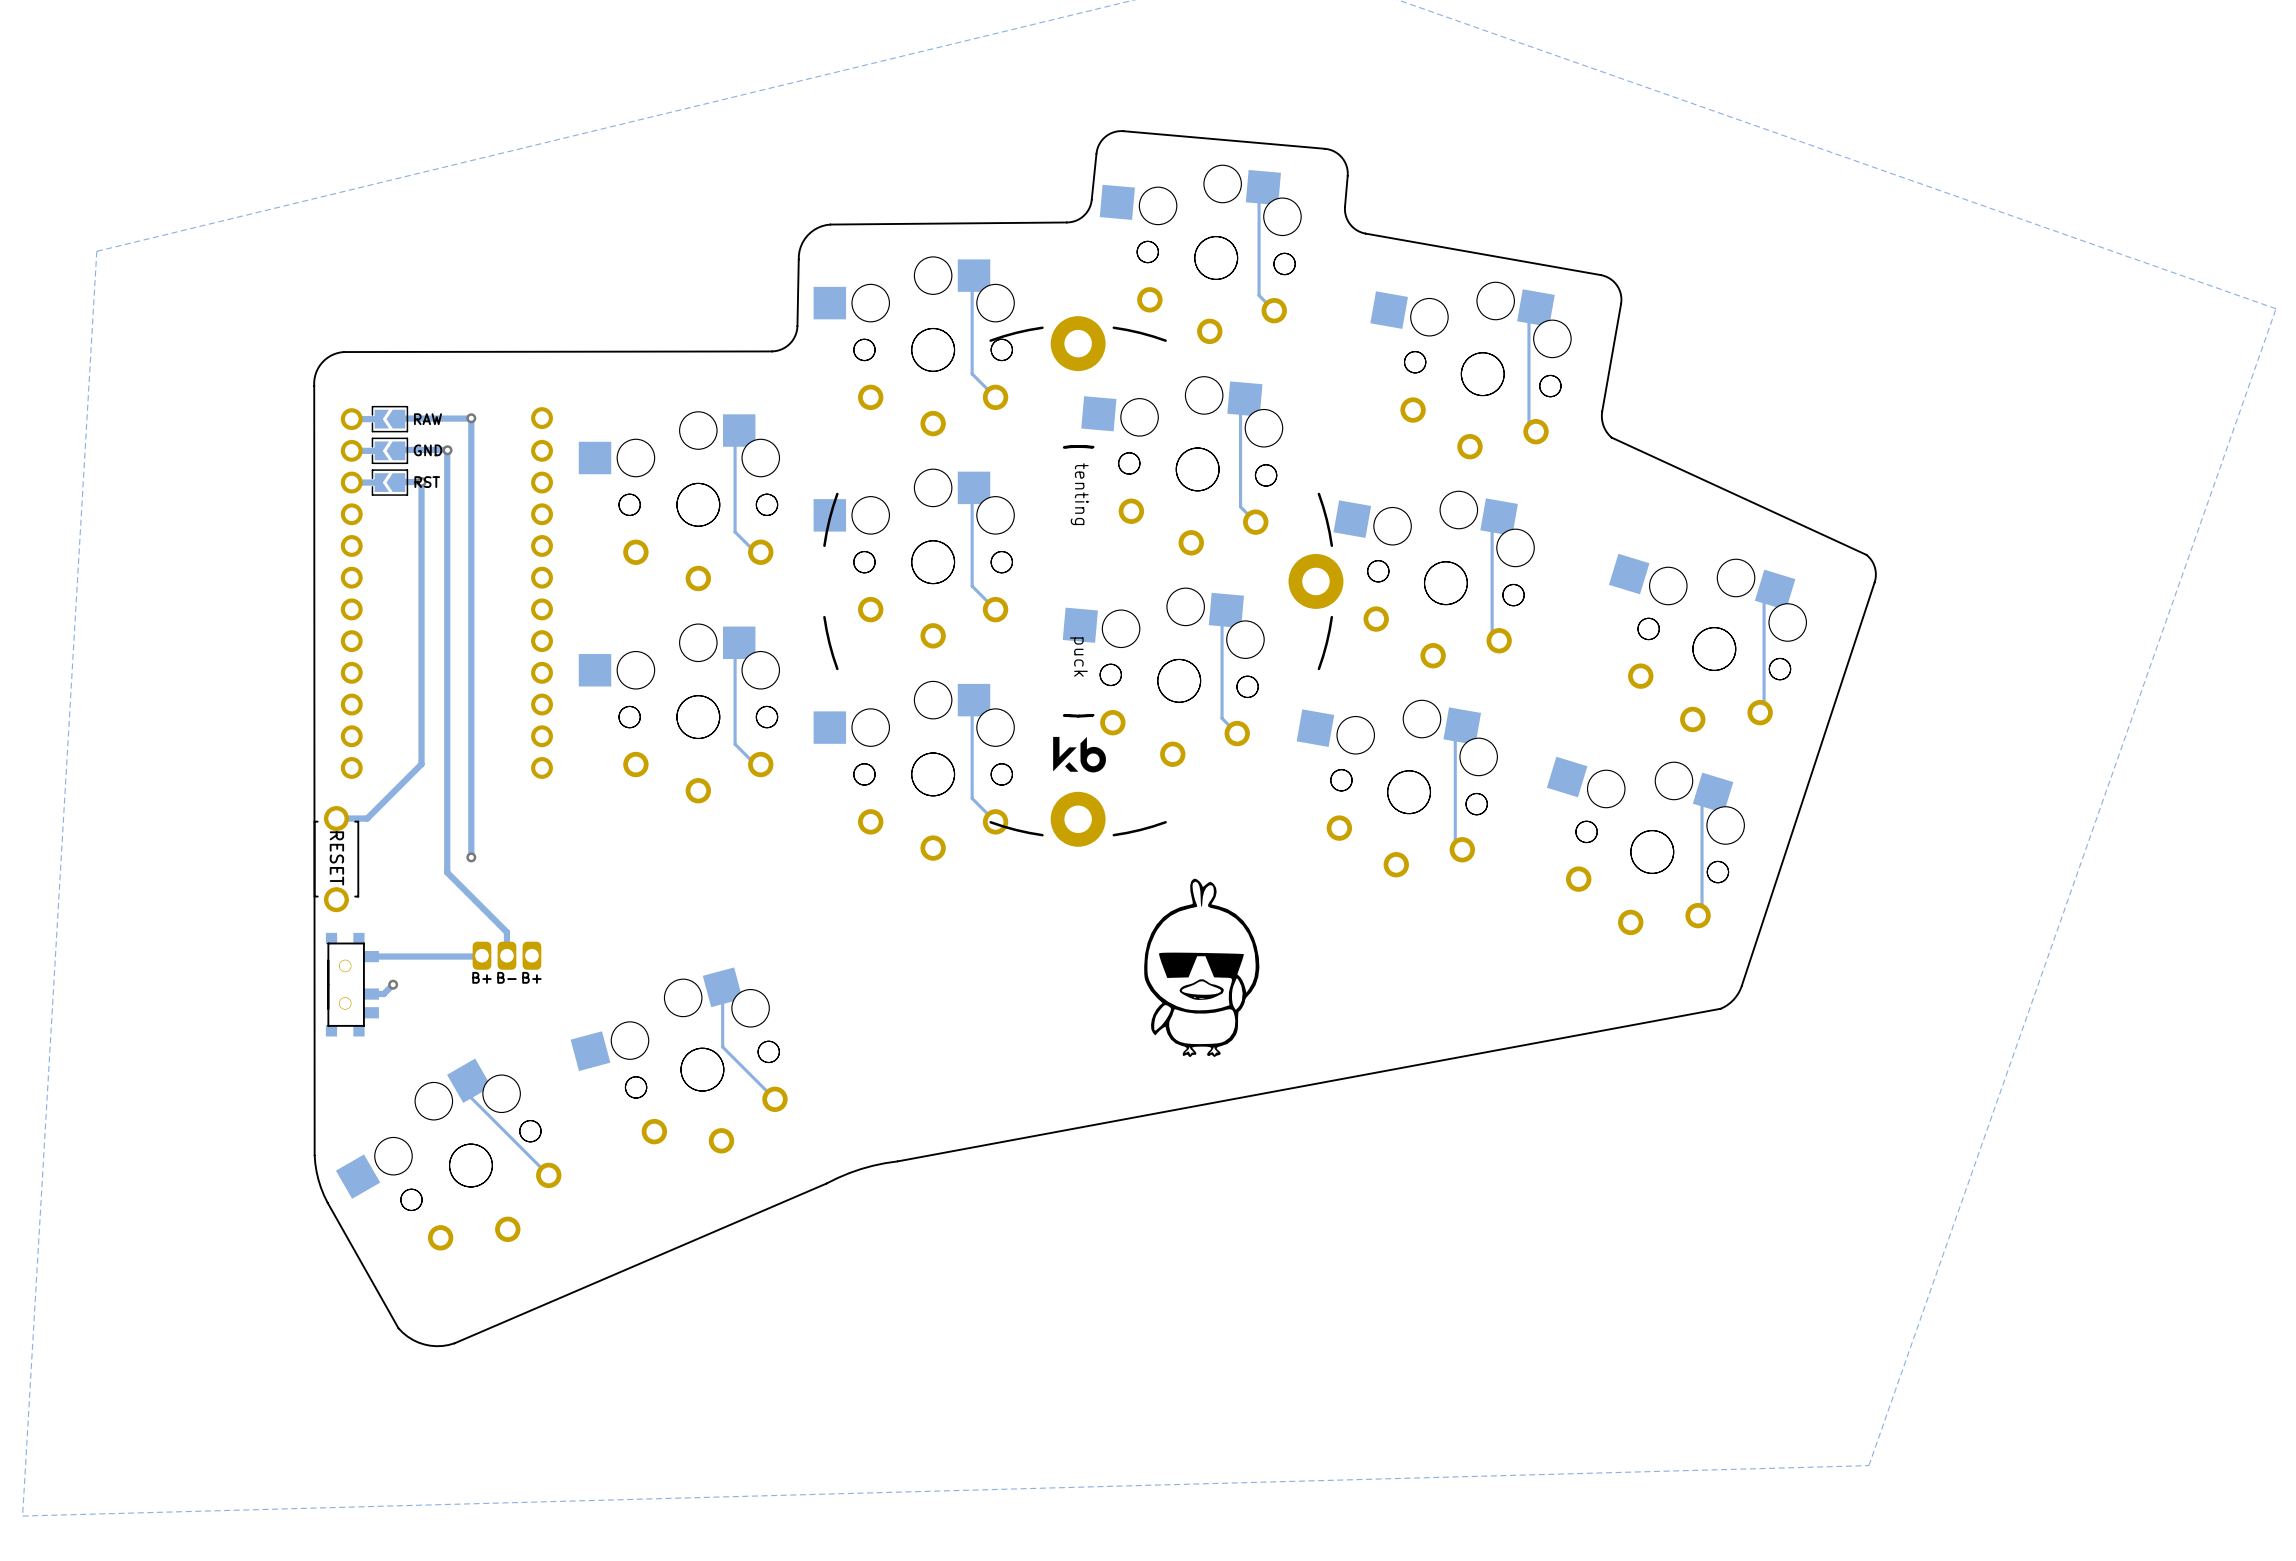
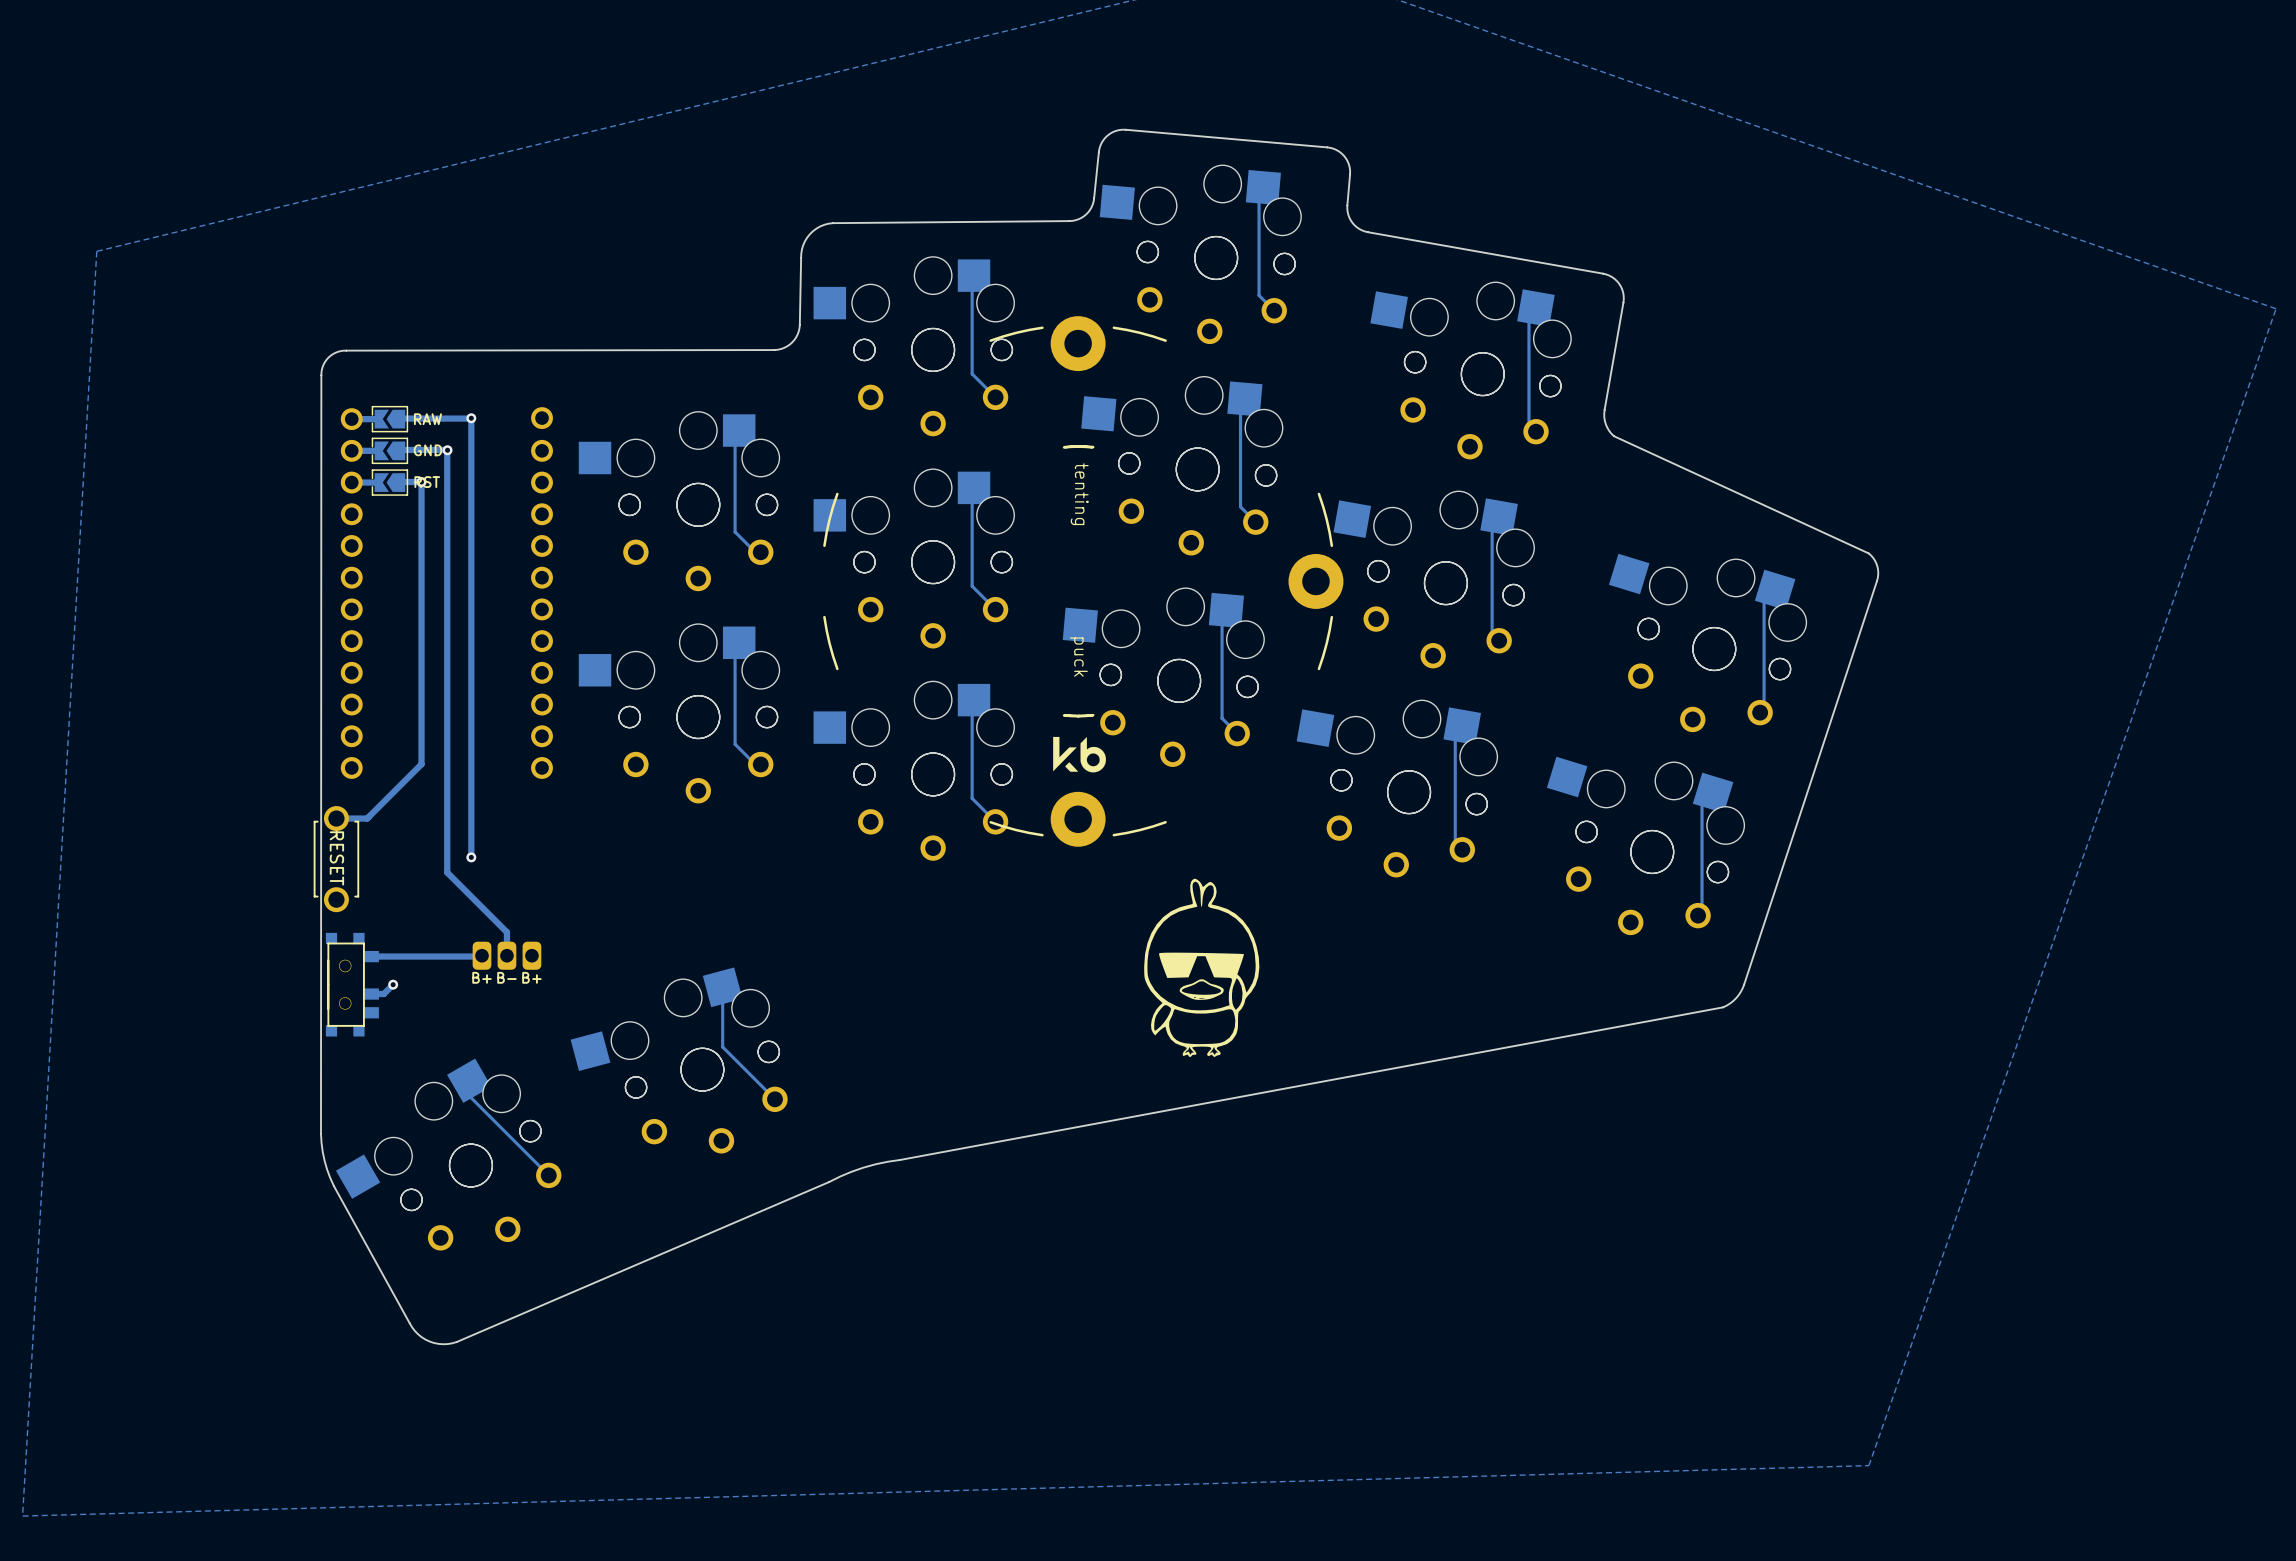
board edge: (1123, 131) (1330, 149) (1340, 155) (1346, 164) (1347, 173) (1345, 212) (1350, 224) (1359, 231) (1608, 277) (1616, 285) (1621, 298) (1601, 414) (1603, 425) (1608, 434) (1866, 554) (1870, 559) (1875, 570) (1874, 582) (1738, 993) (1730, 1002) (1720, 1008) (873, 1165) (837, 1177) (454, 1343) (436, 1346) (412, 1339) (398, 1328) (327, 1202) (320, 1187) (315, 1163) (314, 382) (317, 368) (330, 356) (343, 352) (778, 350) (789, 343) (796, 332) (799, 250) (804, 238) (814, 229) (830, 224) (1066, 222) (1075, 220) (1083, 215) (1090, 205) (1096, 151) (1099, 143) (1109, 133) (1123, 131) -> (1125, 129) (1333, 148) (1342, 153) (1349, 164) (1347, 211) (1352, 222) (1362, 230) (1603, 273) (1612, 277) (1621, 286) (1623, 299) (1604, 413) (1605, 424) (1611, 433) (1868, 553) (1873, 557) (1877, 569) (1876, 581) (1740, 991) (1733, 1001) (1723, 1007) (875, 1164) (840, 1176) (456, 1341) (443, 1344) (425, 1339) (412, 1327) (333, 1186) (327, 1169) (321, 1143) (321, 375) (325, 361) (332, 354) (343, 350) (780, 349) (792, 342) (798, 331) (801, 249) (807, 237) (816, 228) (832, 223) (1069, 221) (1078, 219) (1086, 214) (1092, 204) (1099, 149) (1102, 141) (1112, 132) (1125, 129)

